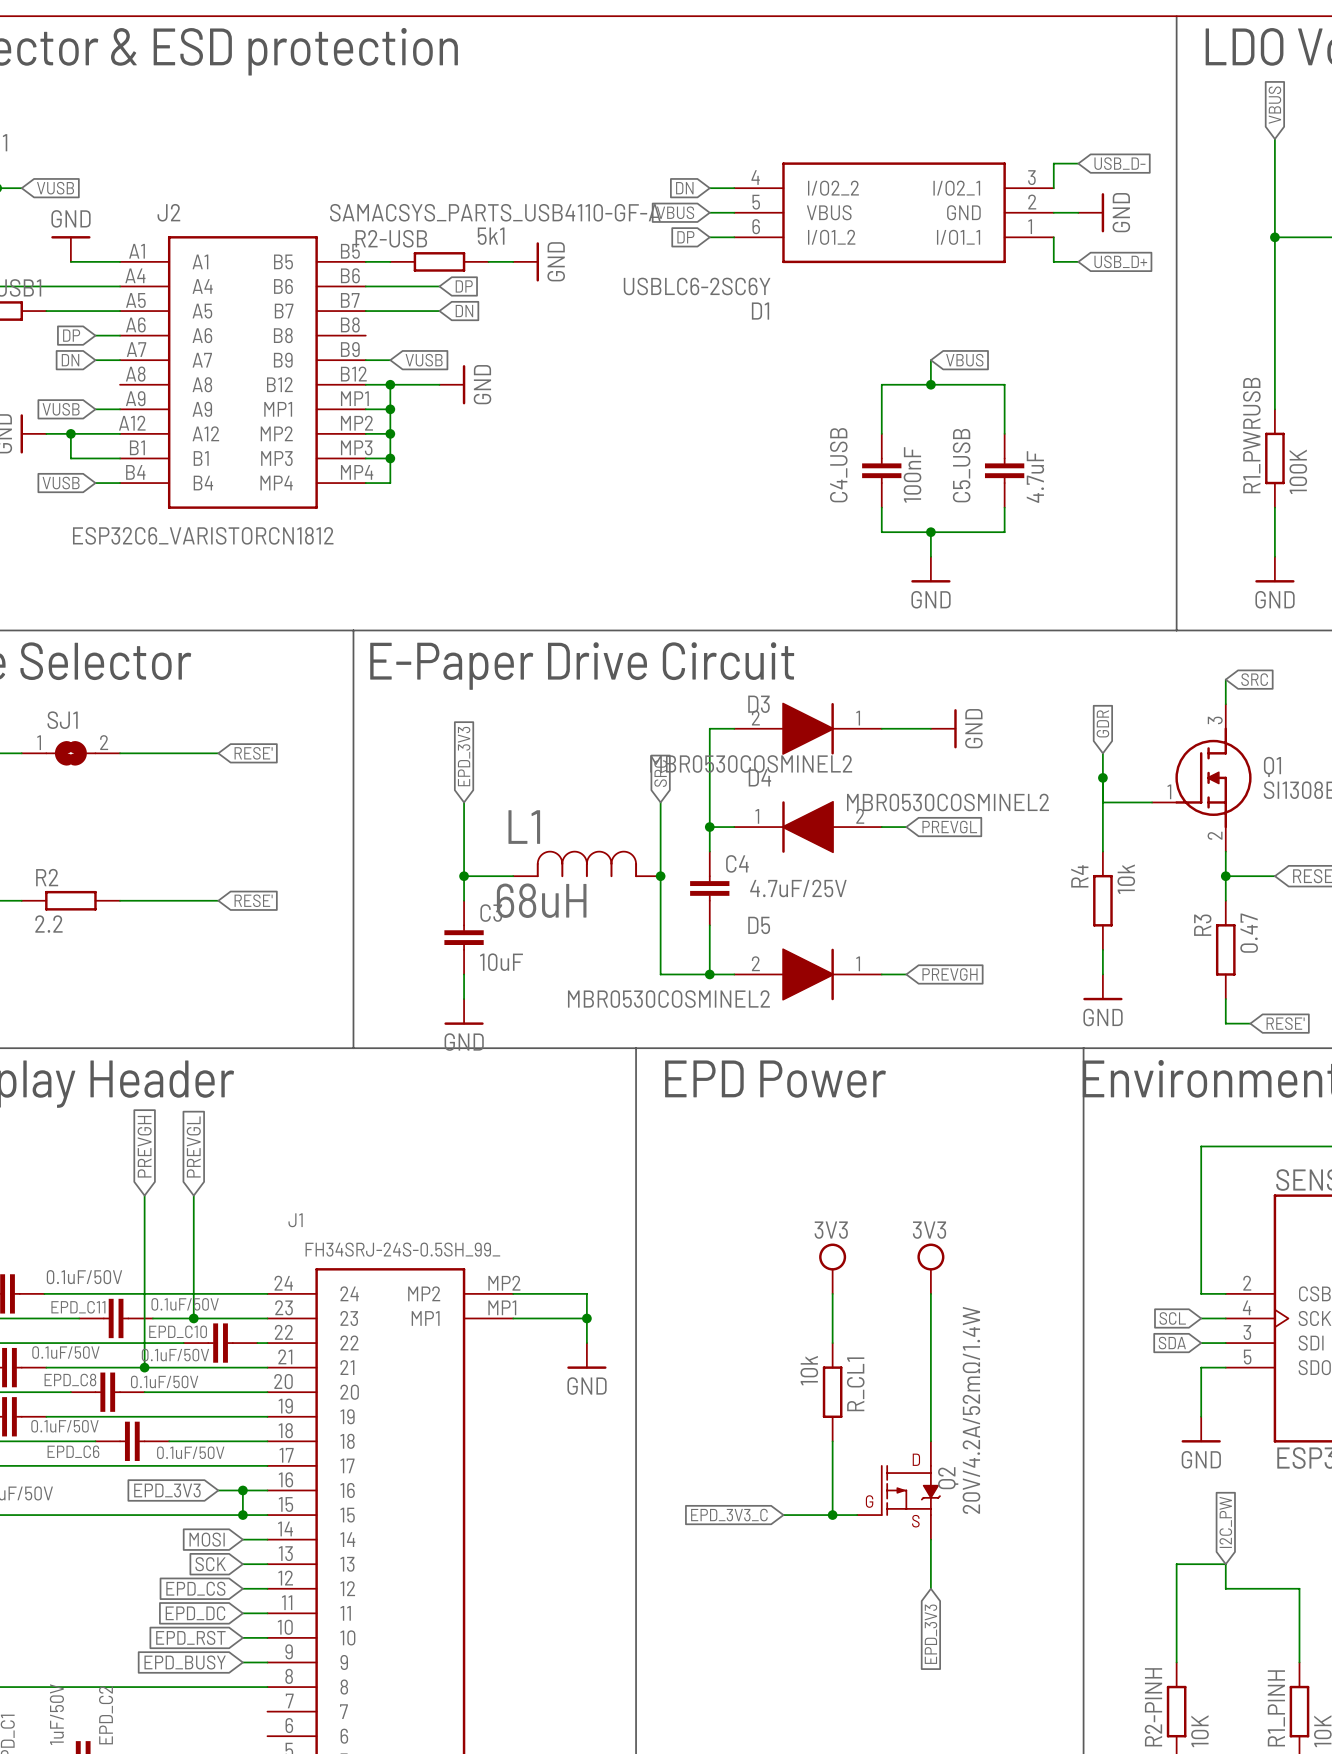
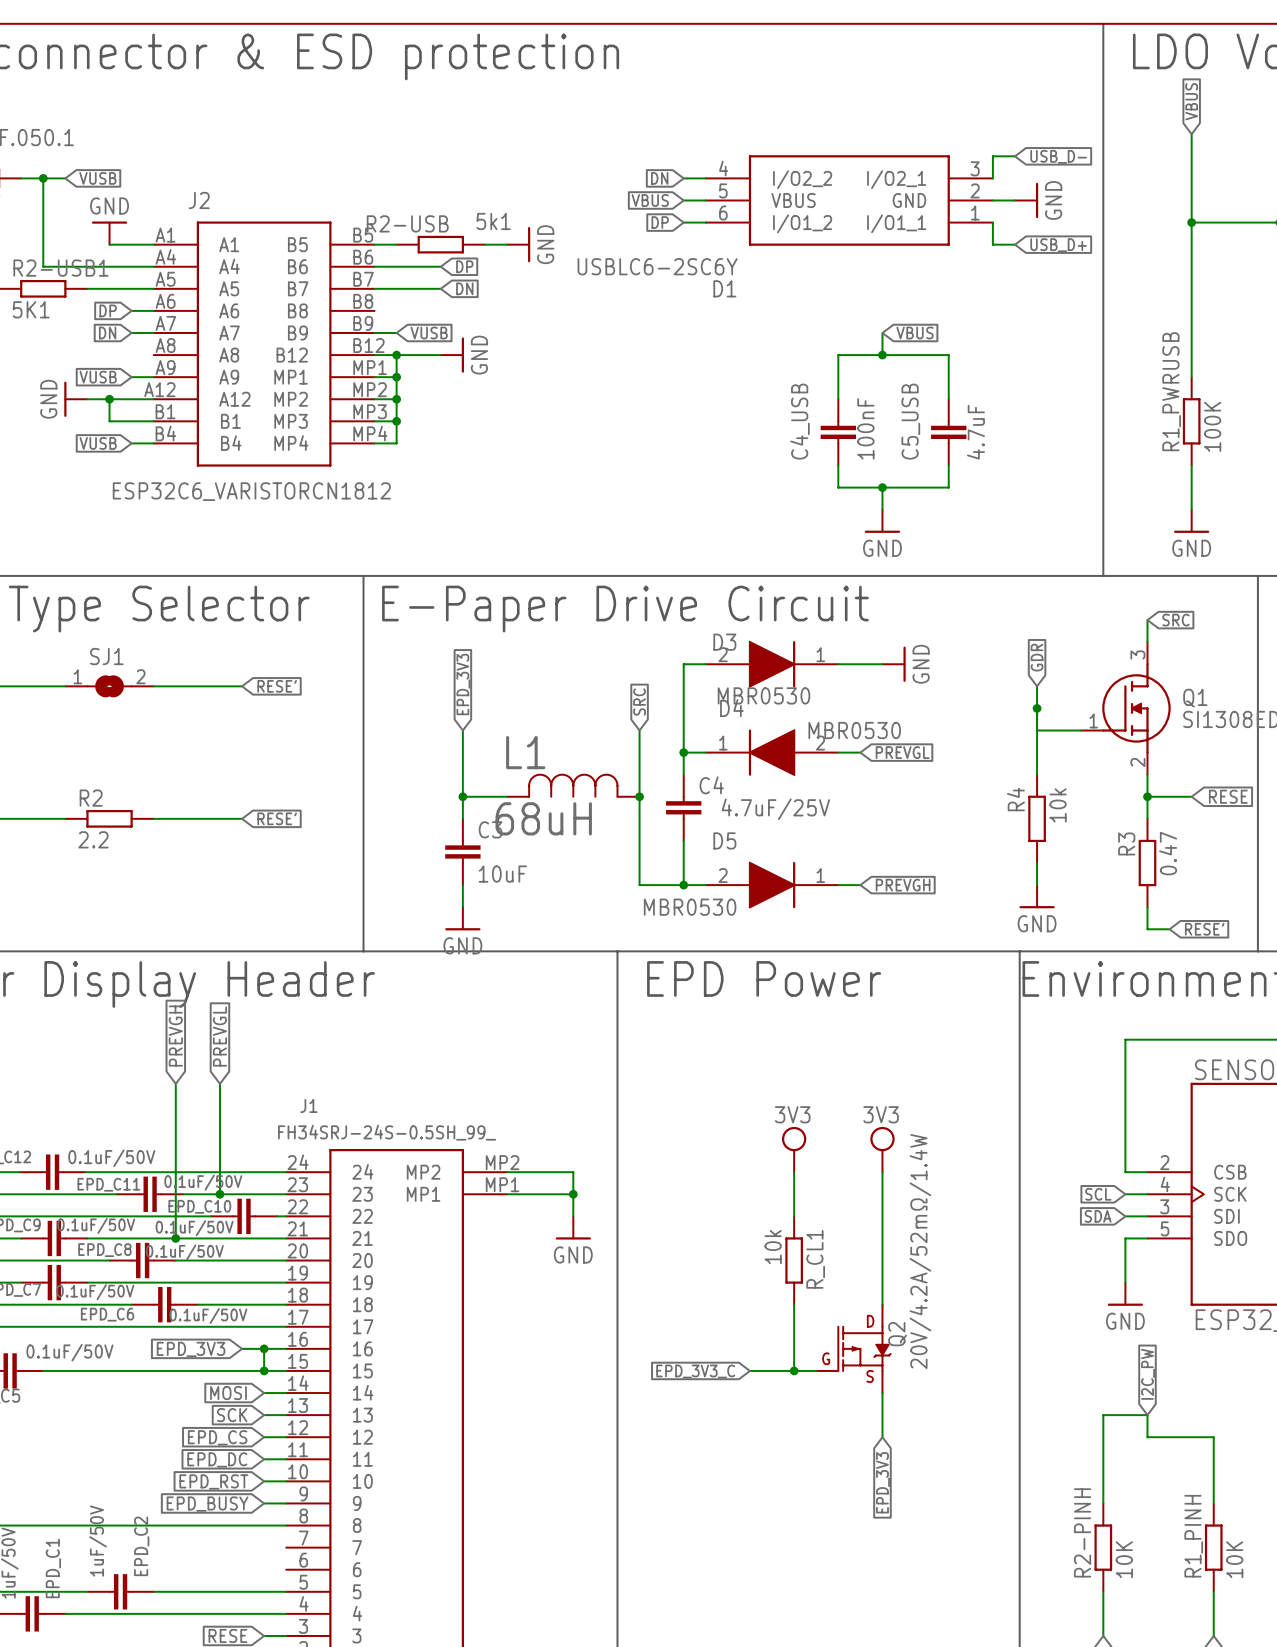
J2 value: SAMACSYS_PARTS_USB4110-GF-A (495, 212) -> none
D3 value: MBR0530COSMINEL2 (751, 763) -> MBR0530 (763, 695)
D4 value: MBR0530COSMINEL2 (947, 802) -> MBR0530 (854, 730)
D5 value: MBR0530COSMINEL2 (668, 999) -> MBR0530 (690, 907)

